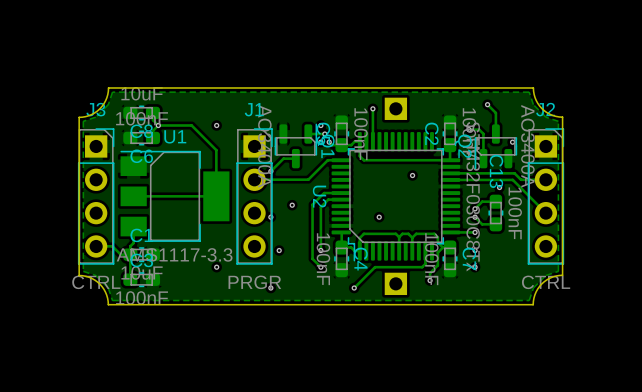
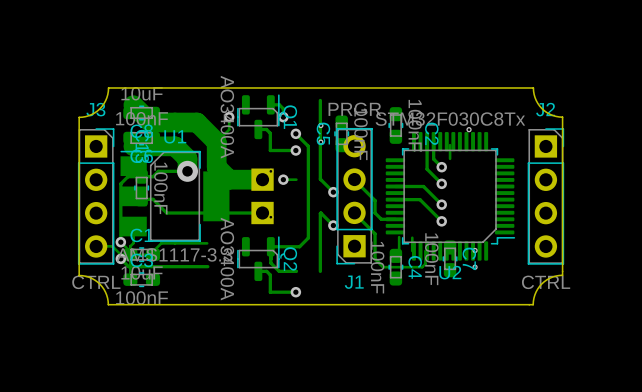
zone outline: (529, 92) (533, 104) (545, 117) (558, 121) (558, 271) (545, 275) (533, 288) (529, 300) (112, 300) (108, 288) (95, 275) (83, 271) (83, 121) (95, 117) (108, 104) (112, 92) (529, 92) -> none
track: none -> (320, 100) (320, 179) (333, 192)
track: none -> (270, 104) (279, 104) (283, 108) (283, 117)
track: (487, 104) (495, 112) (495, 134) -> none
via: (487, 104) -> none
track: none -> (133, 105) (150, 122) (197, 122) (216, 142)
track: (372, 108) (372, 141) -> none
via: (372, 108) -> none
part: (395, 108) -> none
track: none -> (229, 117) (229, 129) (216, 142)
via: none -> (229, 117)
via: none -> (283, 117)
via: (158, 125) -> none
via: (216, 125) -> none
track: none -> (258, 129) (266, 129) (270, 133) (270, 150) (295, 150)
track: (469, 129) (479, 129) (483, 133) (483, 158) -> none
track: none -> (295, 133) (308, 146) (308, 238) (299, 246) (270, 246) (270, 258)
via: none -> (295, 133)
C2 position: (450, 133) -> (395, 125)
track: (324, 134) (308, 134) -> none
via: (324, 134) -> none
track: (152, 138) (152, 130) (158, 125) (191, 125) (216, 150) (216, 196) (133, 196) -> none
track: none -> (427, 141) (427, 169) (441, 183)
track: none -> (433, 141) (433, 159) (441, 167)
track: none -> (216, 142) (216, 167) (229, 179) (254, 179)
track: (329, 142) (332, 145) (351, 145) (354, 141) (359, 141) (359, 156) (363, 160) (450, 160) -> none
via: (329, 142) -> none
via: (512, 142) -> none
Q1 position: (295, 145) -> (258, 116)
track: none -> (133, 146) (175, 146) (187, 158) (187, 171) (158, 171) (152, 176) (127, 176) (120, 183) (120, 242) (133, 254) (150, 254) (161, 243) (207, 243)
Q2 rotation: 0° (495, 146) -> 180° (258, 258)
Q2 position: (495, 146) -> (258, 258)
via: none -> (295, 150)
track: (295, 158) (283, 158) (270, 171) -> none
track: (341, 160) (327, 160) (308, 179) (296, 179) -> none
via: none -> (441, 167)
via: none -> (187, 171)
track: (450, 173) (514, 173) (521, 179) (545, 179) -> none
via: (412, 175) -> none
part: none -> (262, 179)
track: (283, 179) (262, 179) -> none
via: none -> (283, 179)
track: none -> (354, 179) (375, 200) (375, 213) (381, 219) (395, 219)
track: (450, 179) (512, 179) (545, 213) -> none
via: none -> (441, 183)
track: none -> (395, 186) (423, 186) (441, 204)
via: (499, 187) -> none
via: none -> (333, 192)
track: (341, 193) (324, 193) (312, 204) (312, 258) (320, 267) -> none
J1 rotation: 0° (254, 196) -> 180° (354, 196)
J1 position: (254, 196) -> (354, 196)
U2 rotation: 0° (395, 196) -> 90° counterclockwise (450, 196)
track: none -> (141, 199) (152, 199) (166, 213) (262, 213)
track: (341, 199) (328, 199) (320, 207) (320, 250) -> none
track: none -> (395, 199) (420, 199) (441, 221)
track: (495, 201) (482, 201) (475, 208) -> none
via: none -> (441, 204)
via: (292, 205) -> none
via: (475, 208) -> none
part: none -> (262, 213)
C13 position: (495, 213) -> (141, 188)
via: (379, 217) -> none
track: (475, 217) (482, 224) (495, 224) -> none
via: (475, 217) -> none
via: none -> (441, 221)
track: none -> (333, 225) (320, 213) (320, 271)
via: none -> (333, 225)
track: (475, 232) (450, 232) -> none
via: (475, 232) -> none
track: (341, 233) (341, 247) (351, 247) (354, 250) (359, 250) (359, 238) (363, 233) (395, 233) (399, 237) (402, 233) (408, 233) (412, 237) (416, 233) (434, 233) (437, 237) (437, 242) (442, 247) -> none
via: none -> (120, 242)
track: none -> (270, 246) (270, 263) (279, 271) (296, 271)
track: (442, 247) (437, 252) (437, 265) (430, 273) (430, 280) -> none
via: (279, 250) -> none
via: (320, 250) -> none
track: none -> (120, 258) (128, 266) (207, 266)
via: none -> (120, 258)
C4 position: (341, 258) -> (395, 267)
via: (216, 267) -> none
via: (320, 267) -> none
track: (383, 267) (375, 267) (354, 288) -> (383, 267) (375, 258) (375, 233) (354, 213)
track: none -> (258, 271) (266, 271) (270, 275) (270, 292) (295, 292)
via: (430, 280) -> none
part: (395, 283) -> none
via: (270, 288) -> none
via: (354, 288) -> none
via: none -> (295, 292)

